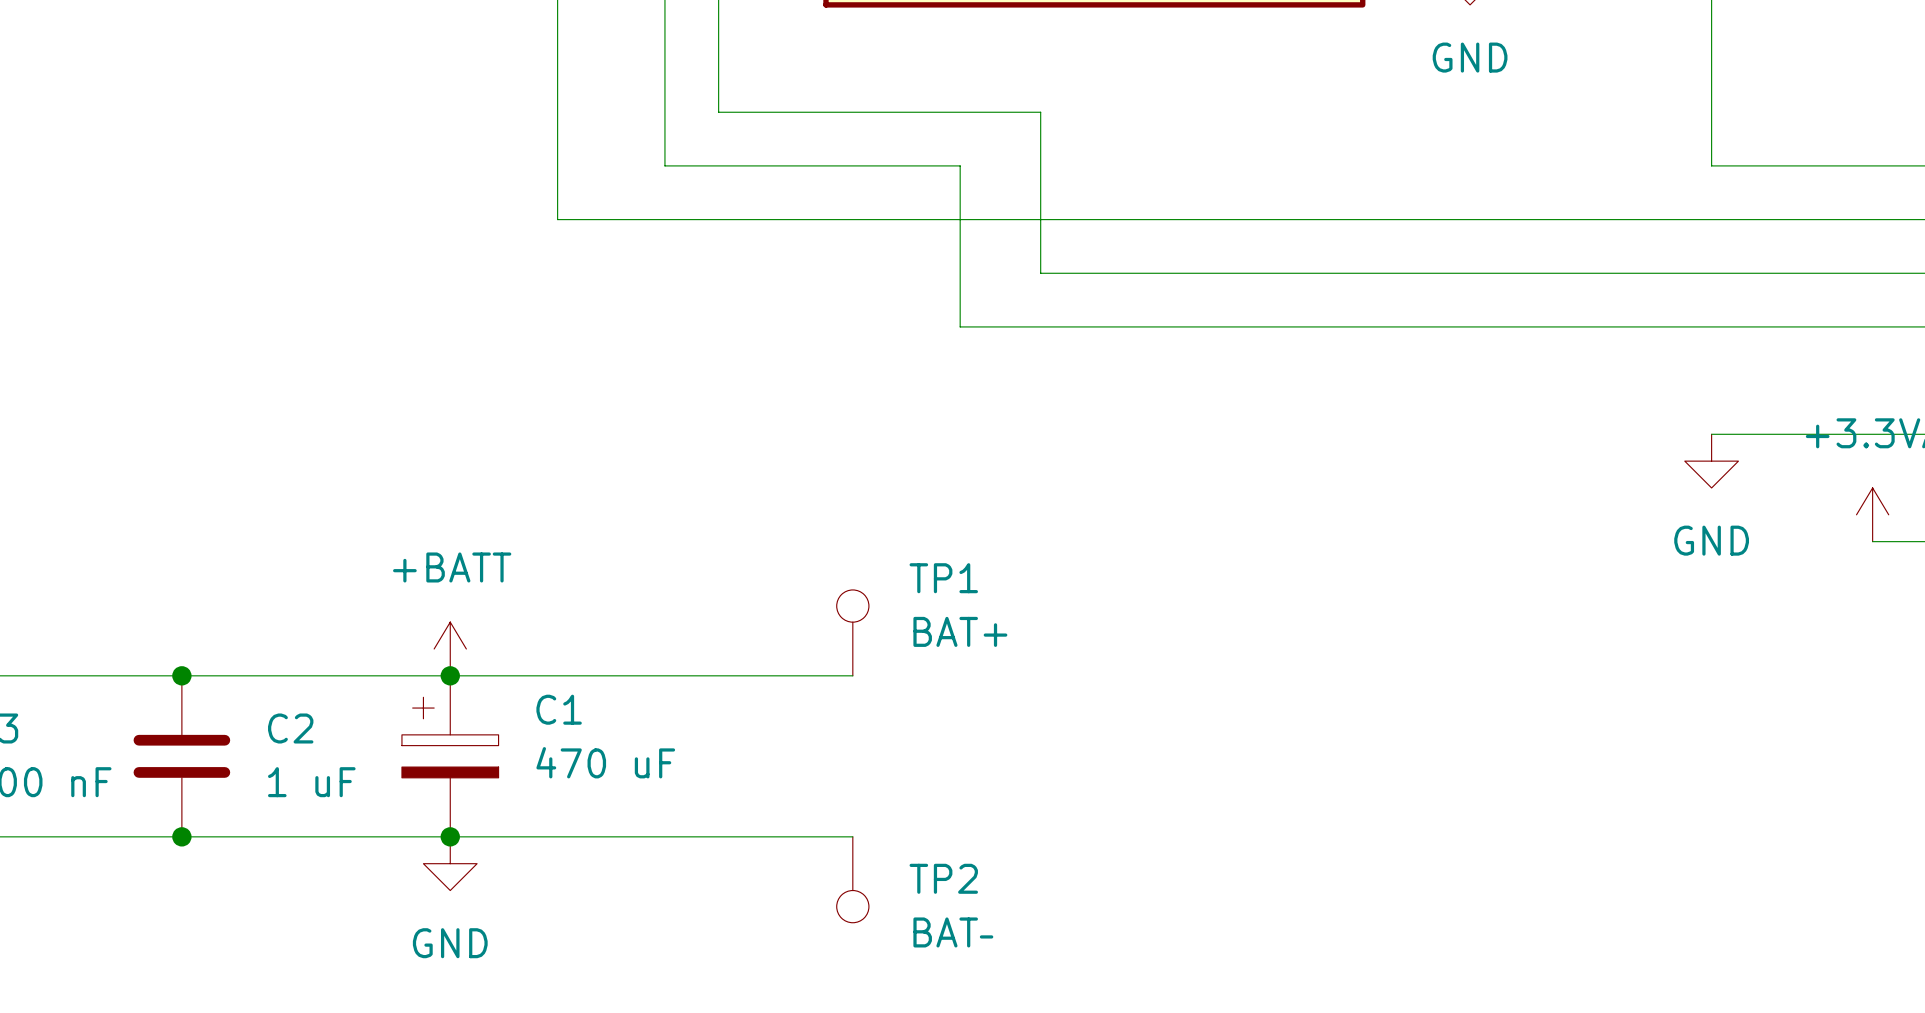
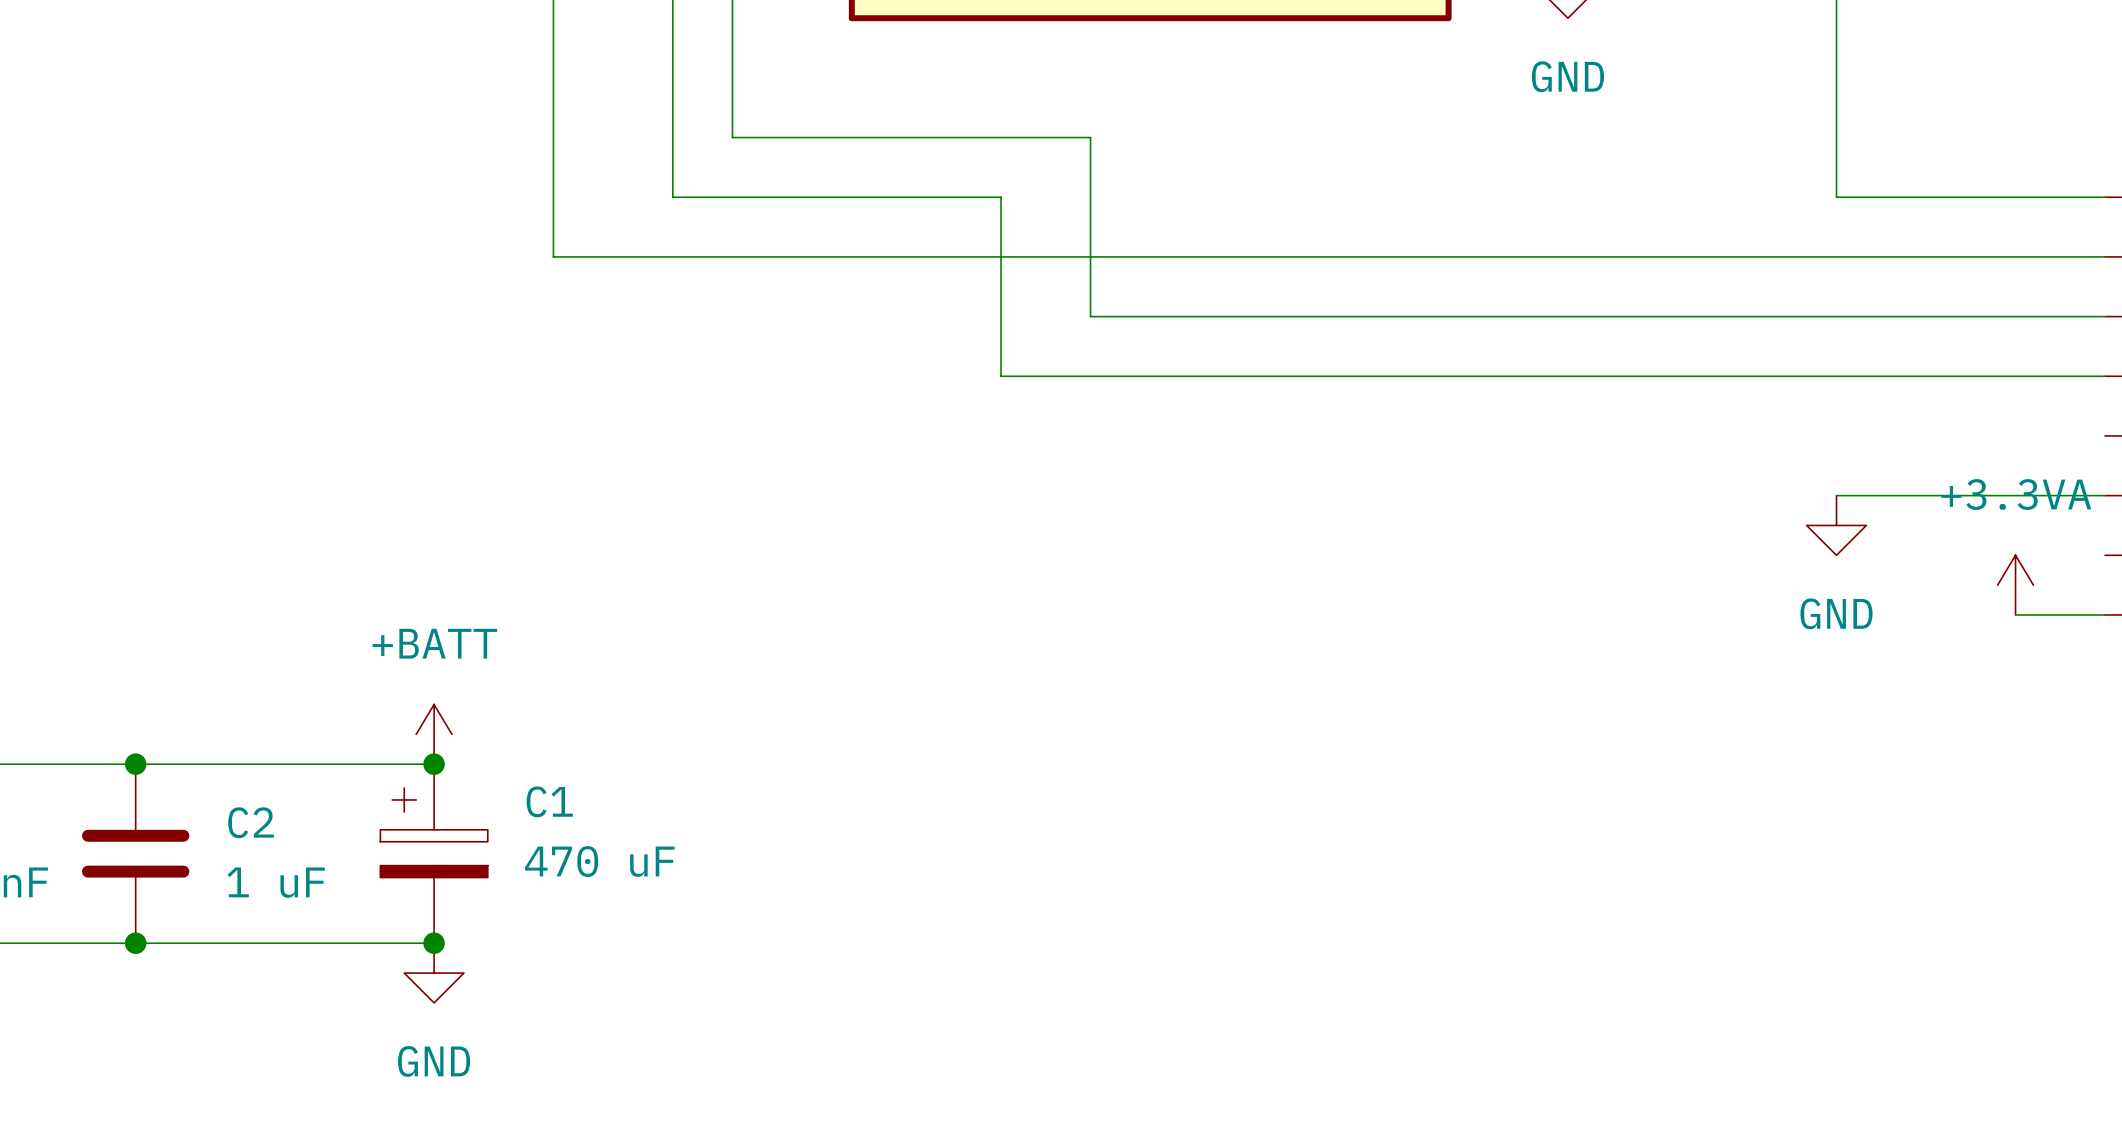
TP1: BAT+ (852, 632) -> none
wire: (450, 675) (852, 675) -> none
wire: (450, 836) (852, 836) -> none
TP2: BAT– (852, 879) -> none

